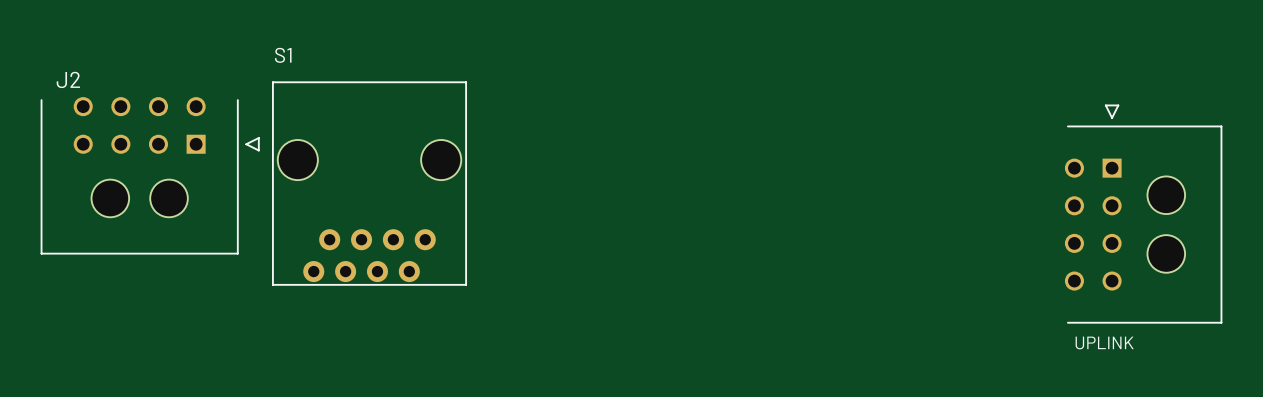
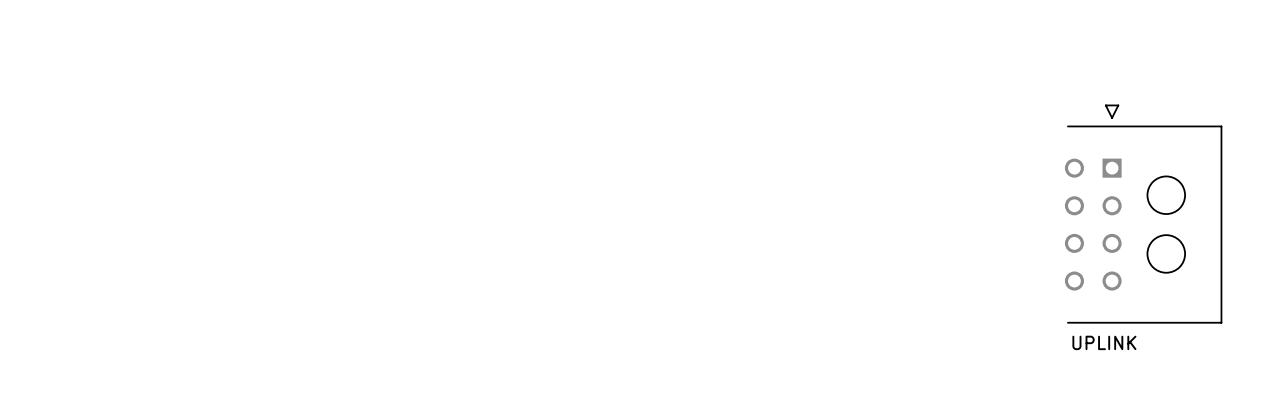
J2: (150, 175) -> none
S1: (369, 183) -> none

